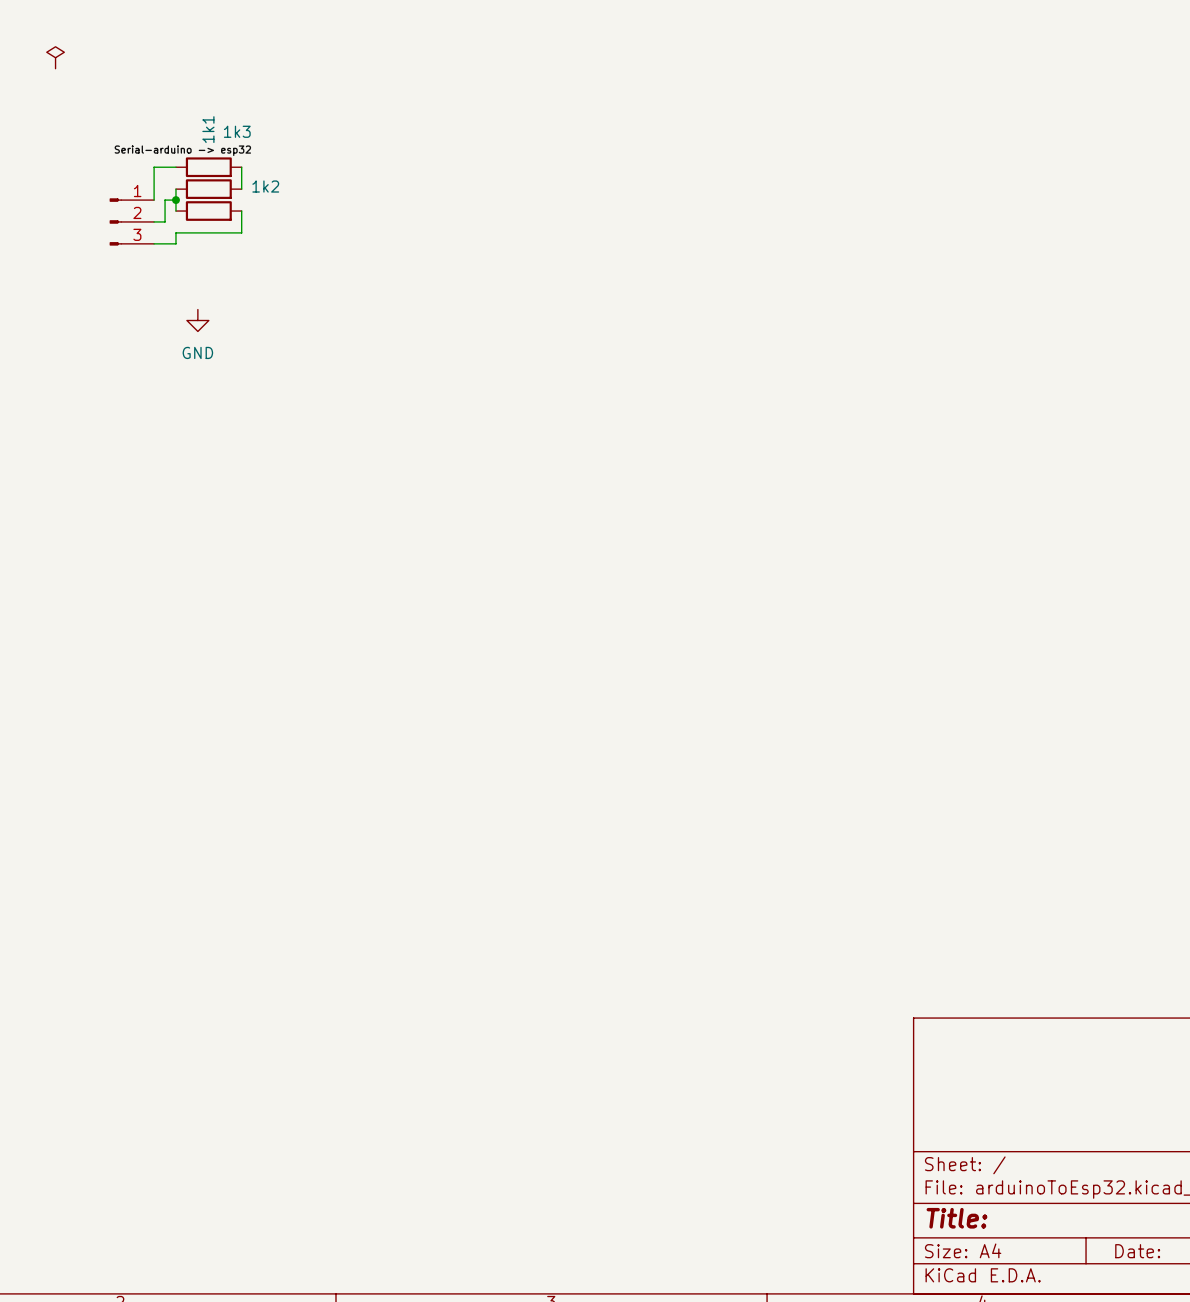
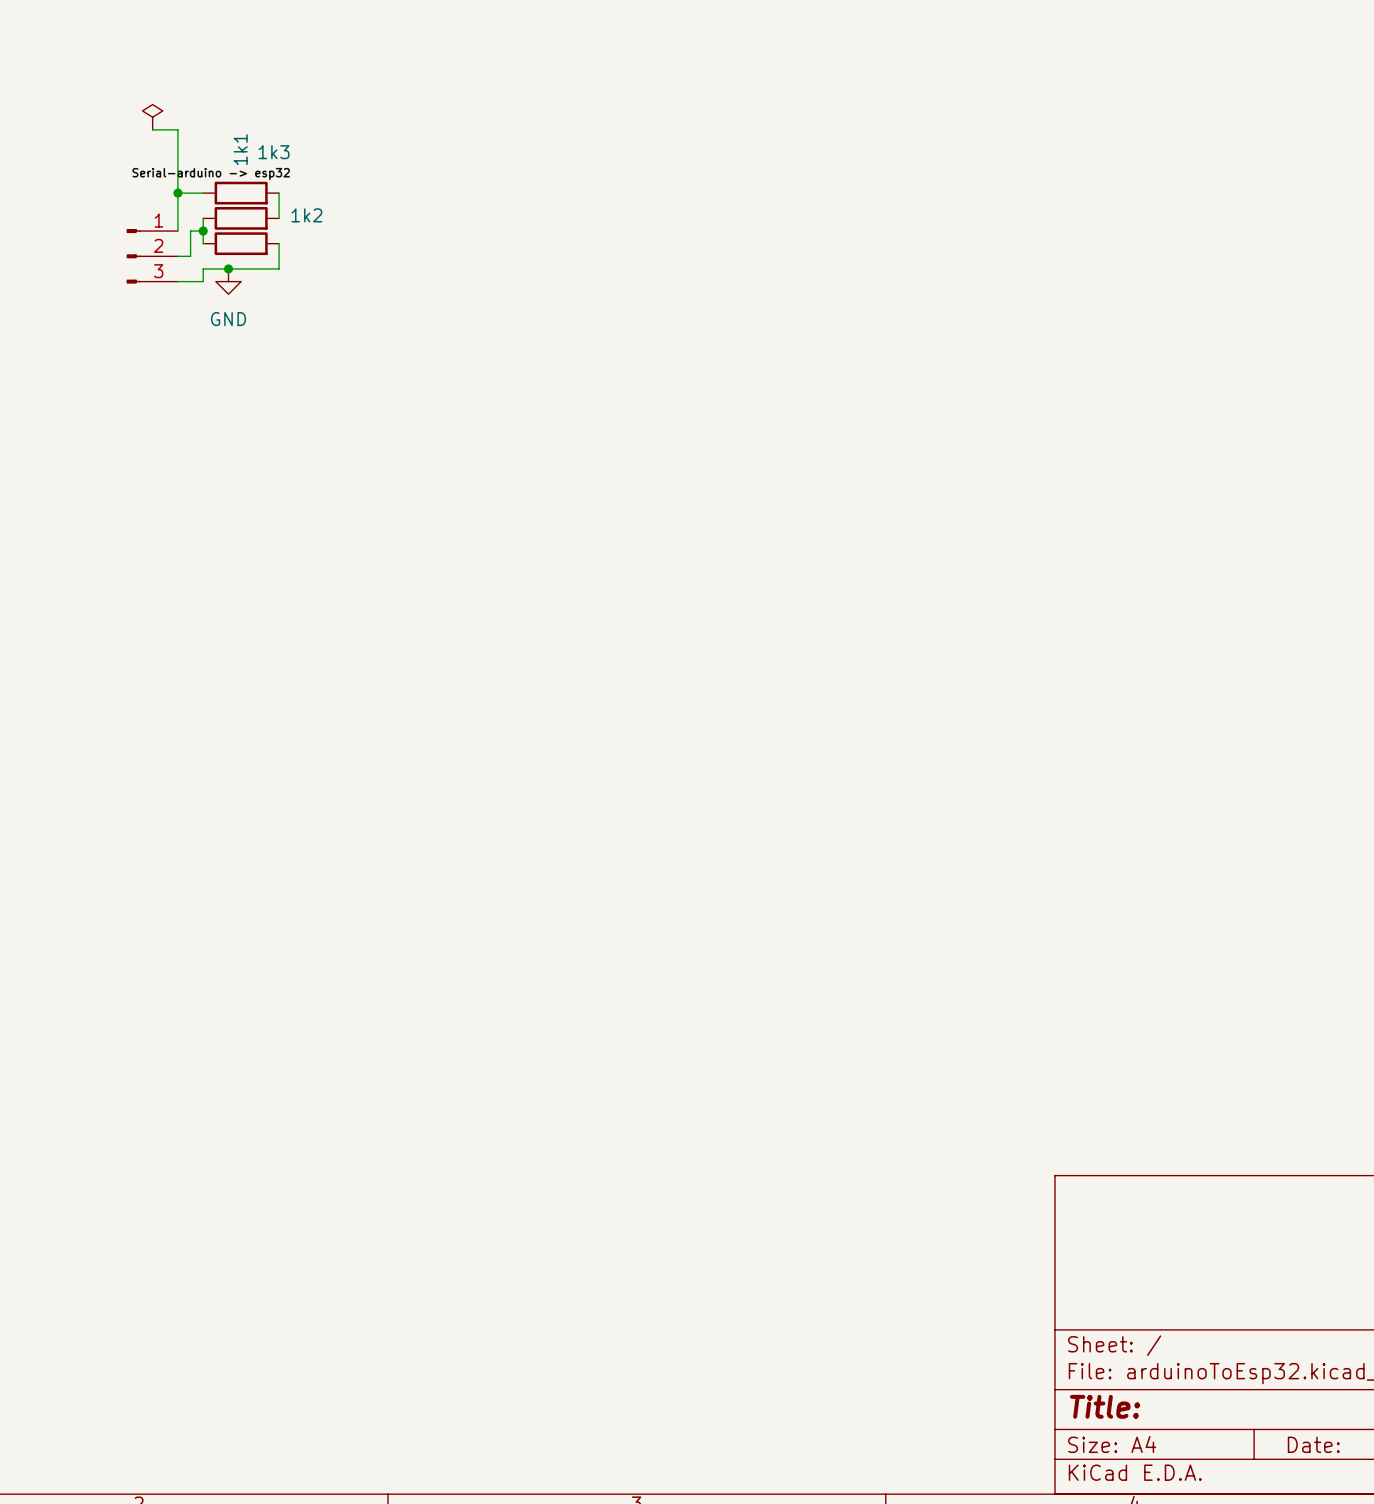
power symbol position: (55, 57) -> (152, 117)
wire: none -> (152, 129) (177, 129) (177, 193)
junction: none -> (177, 193)
junction: none -> (228, 268)
power symbol position: GND (197, 320) -> GND (228, 281)

